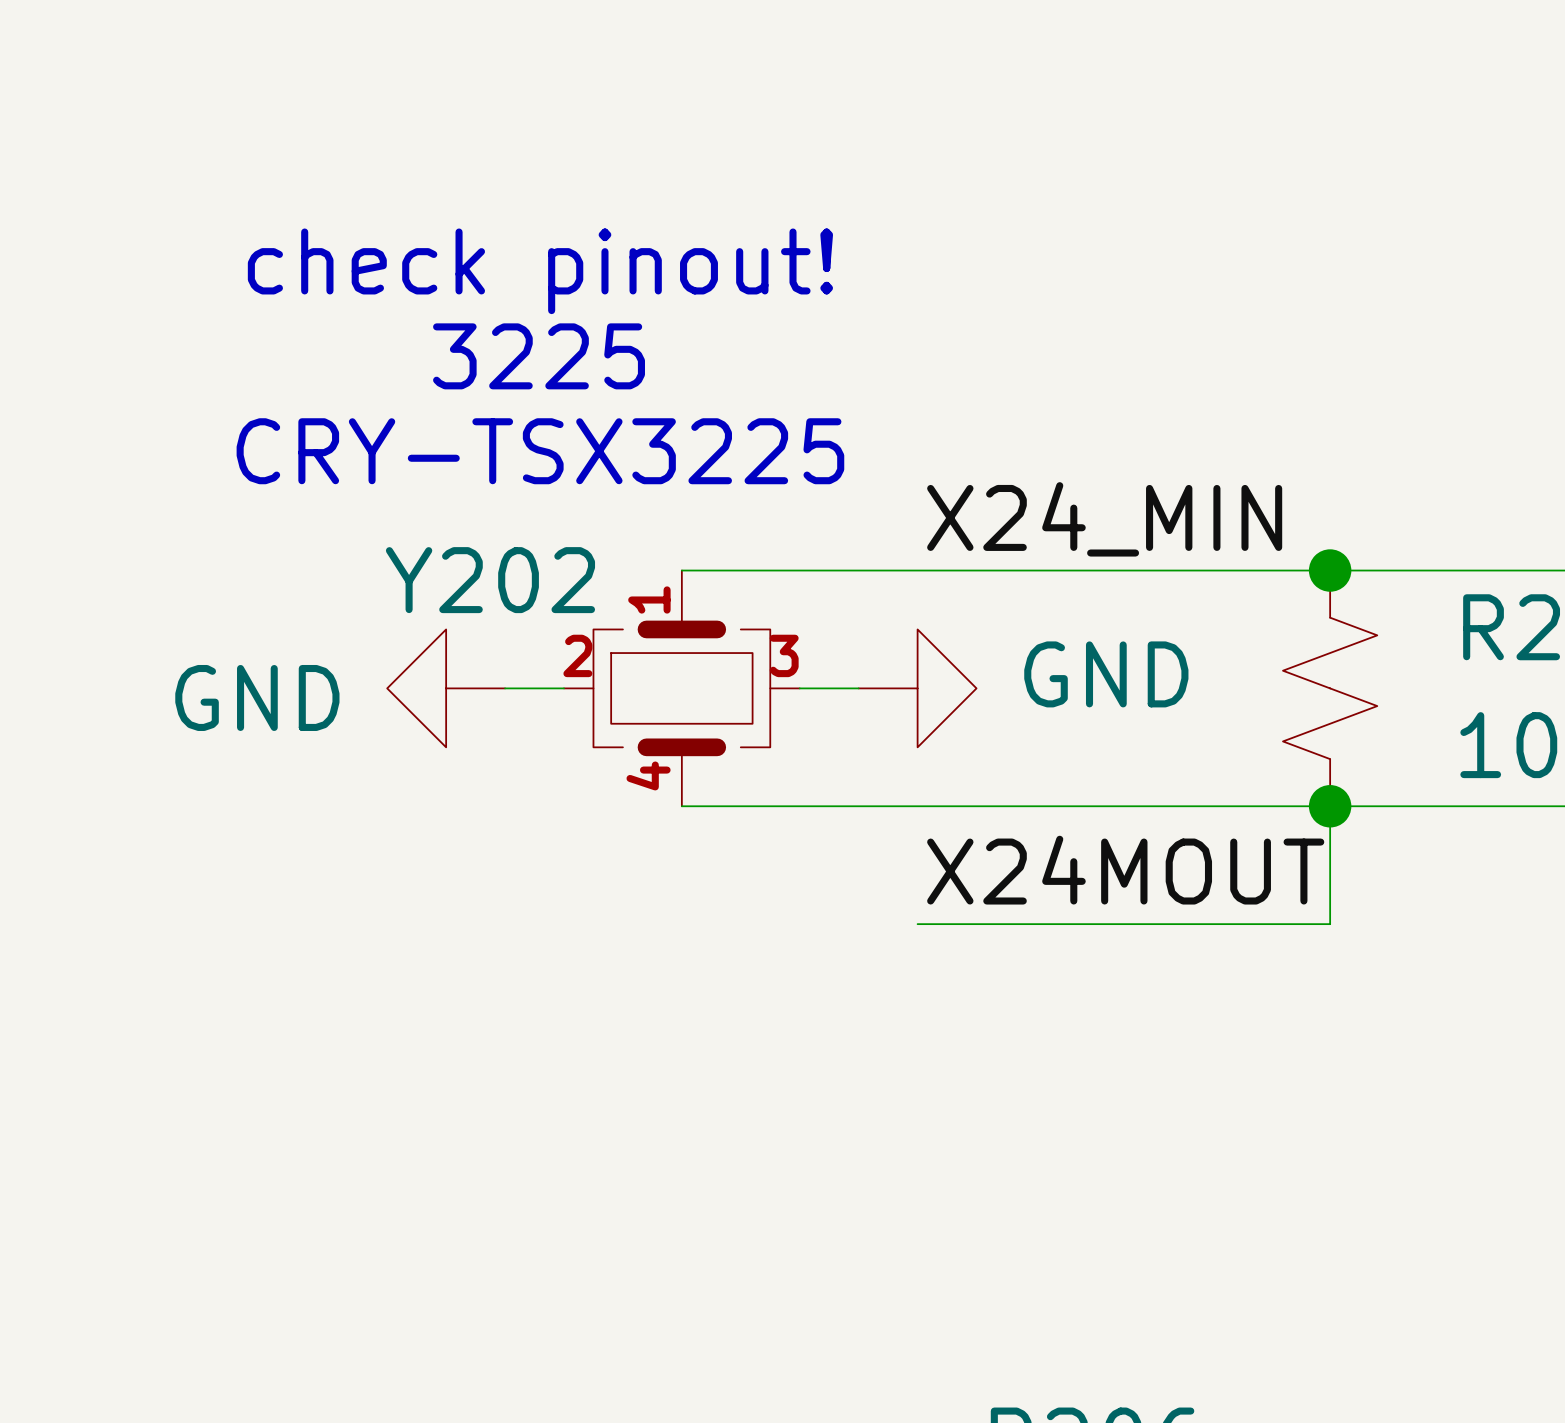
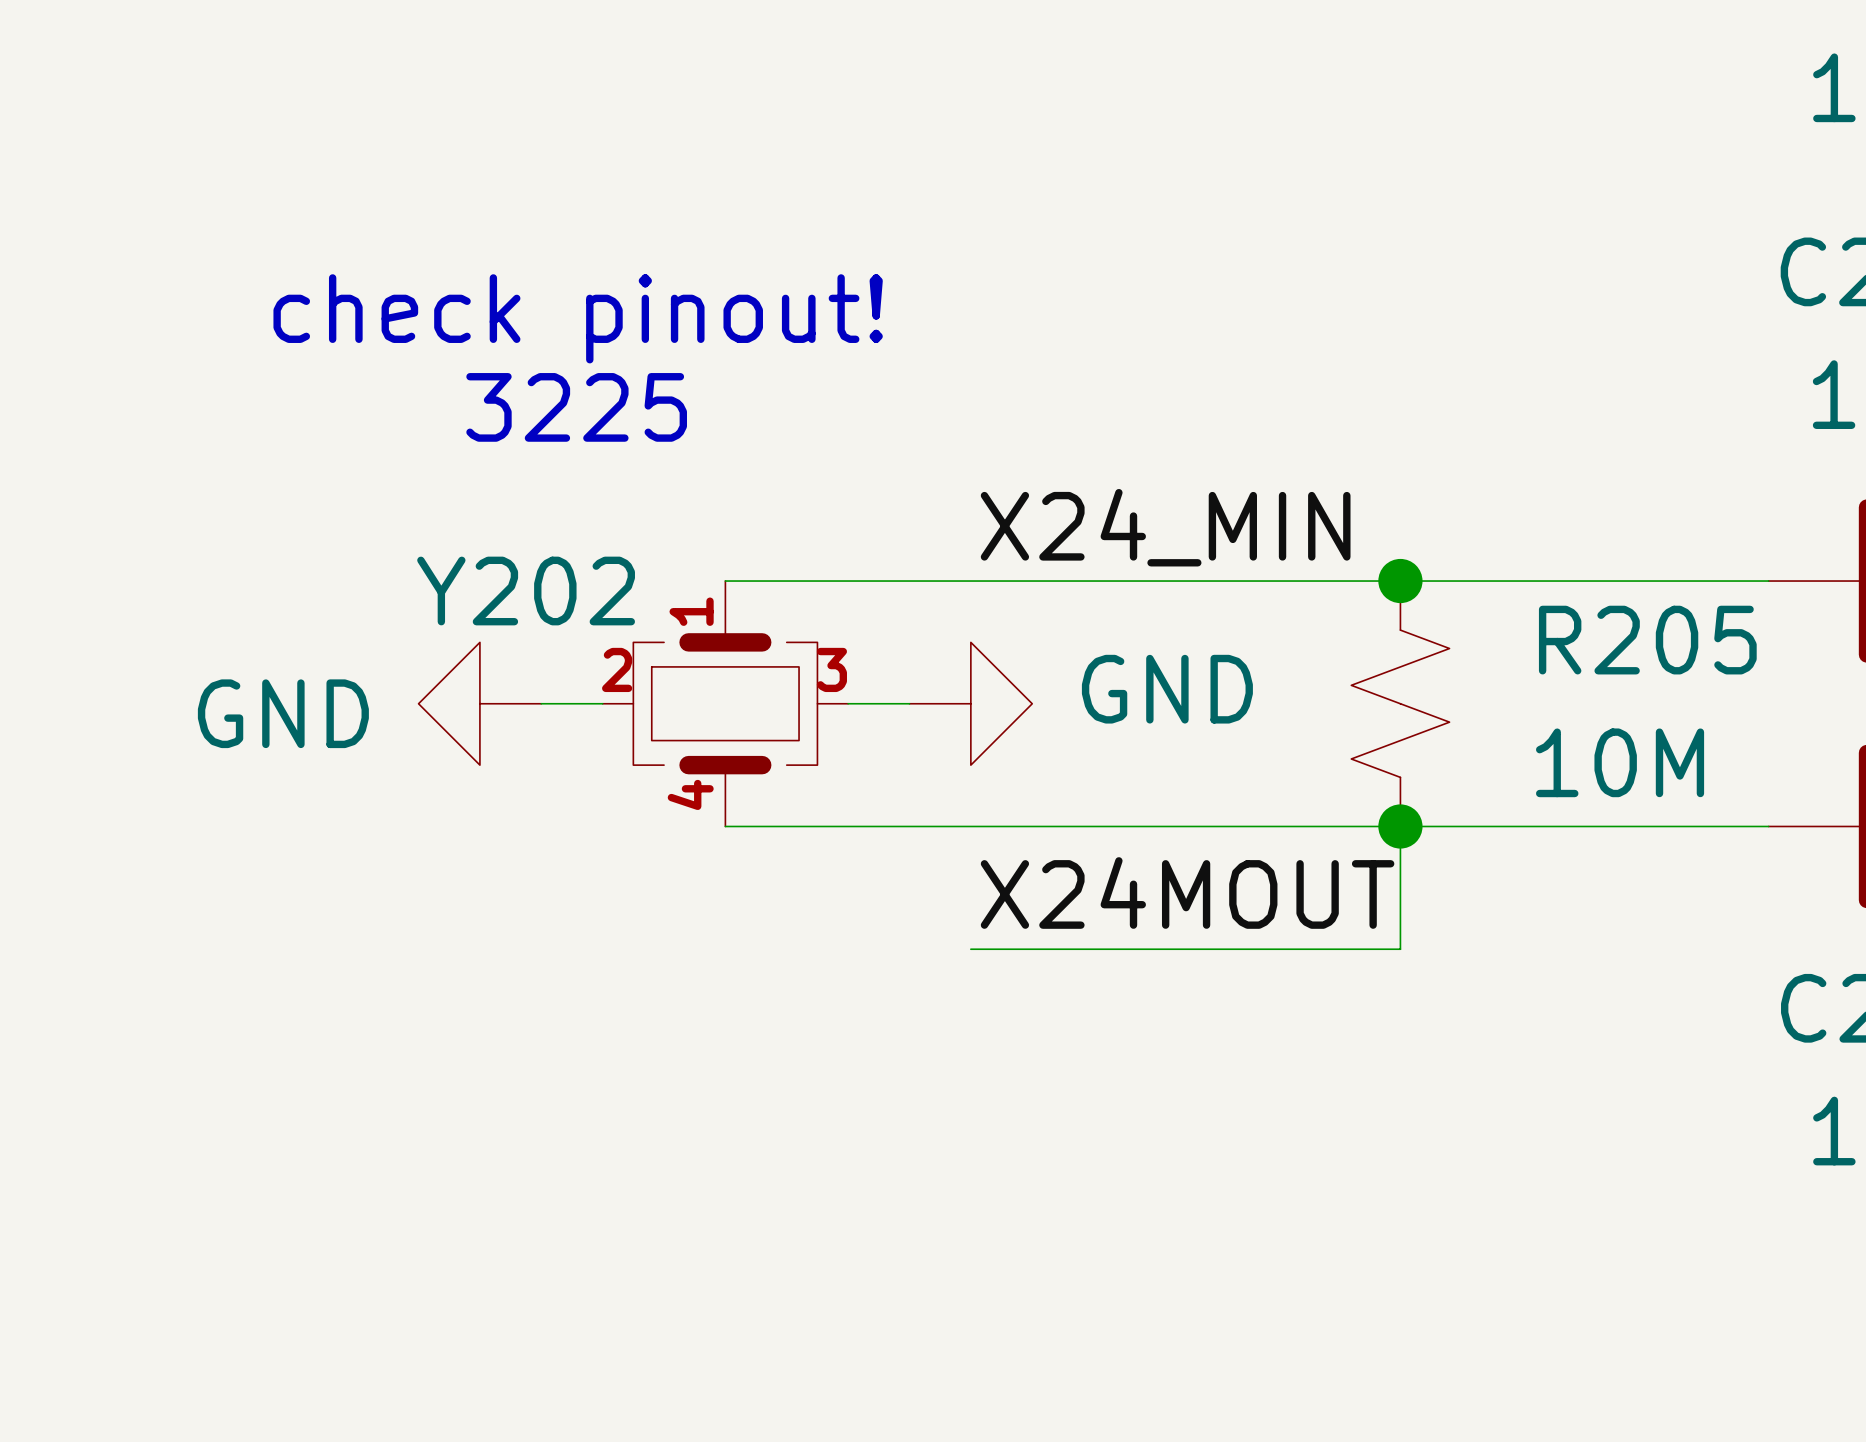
text position: check pinout! (540, 271) -> check pinout! (578, 318)
text position: 3225 (539, 356) -> 3225 (576, 407)
text: CRY-TSX3225 (540, 451) -> none

